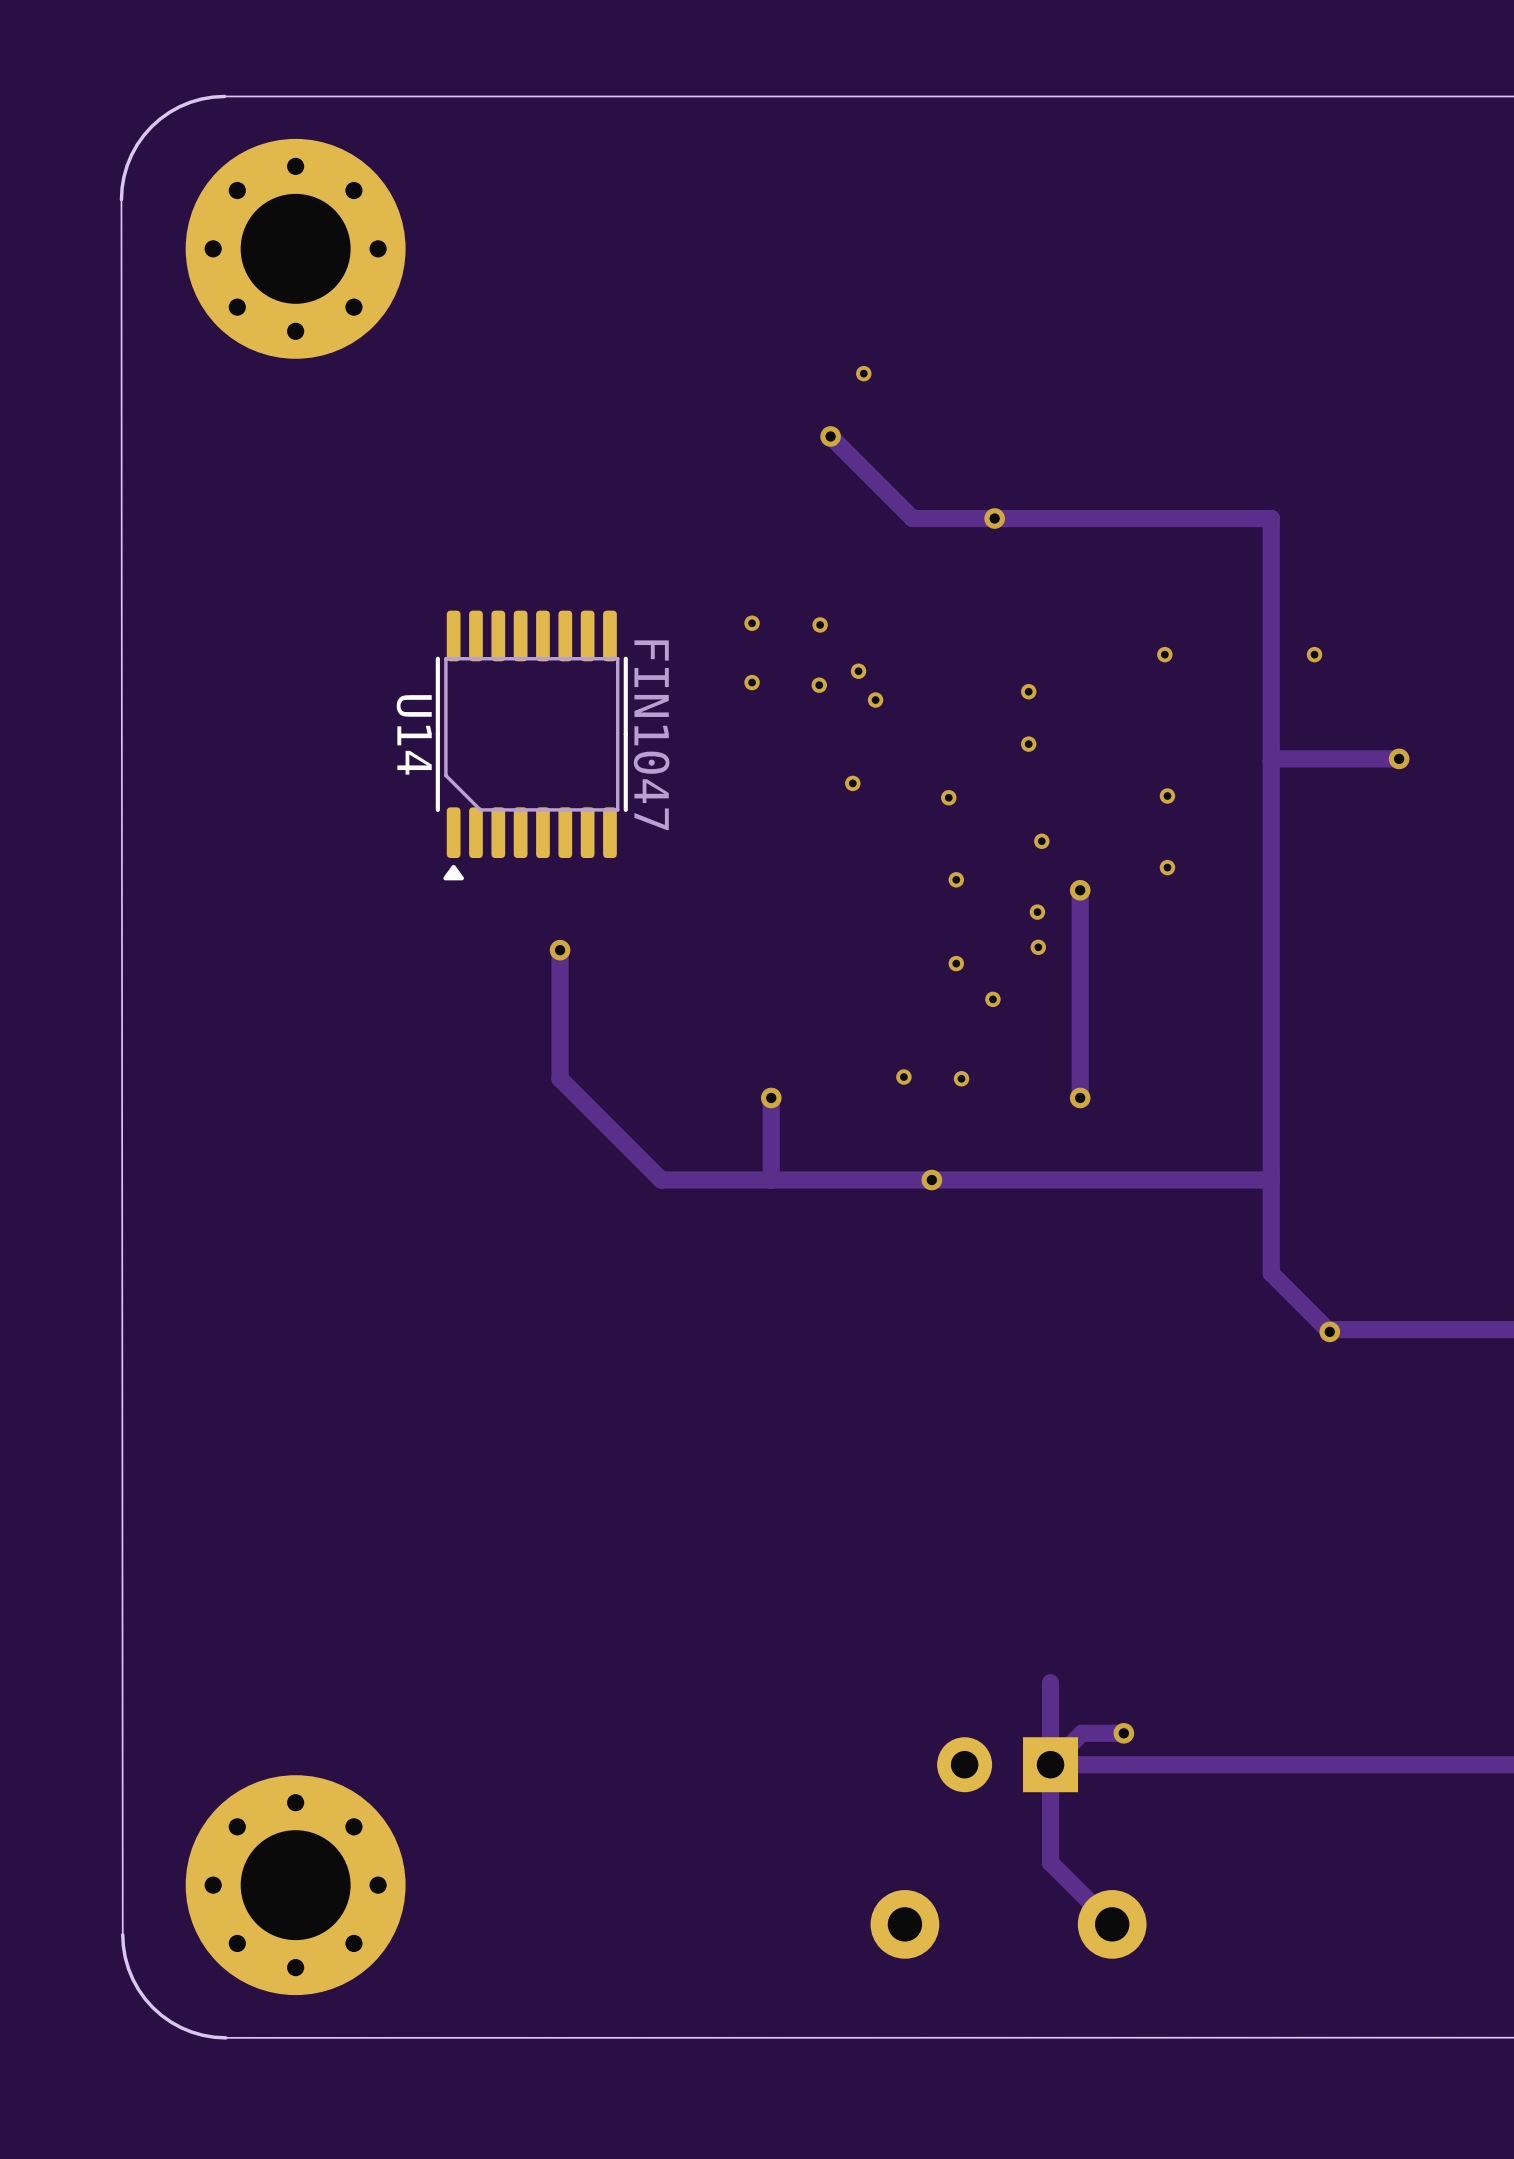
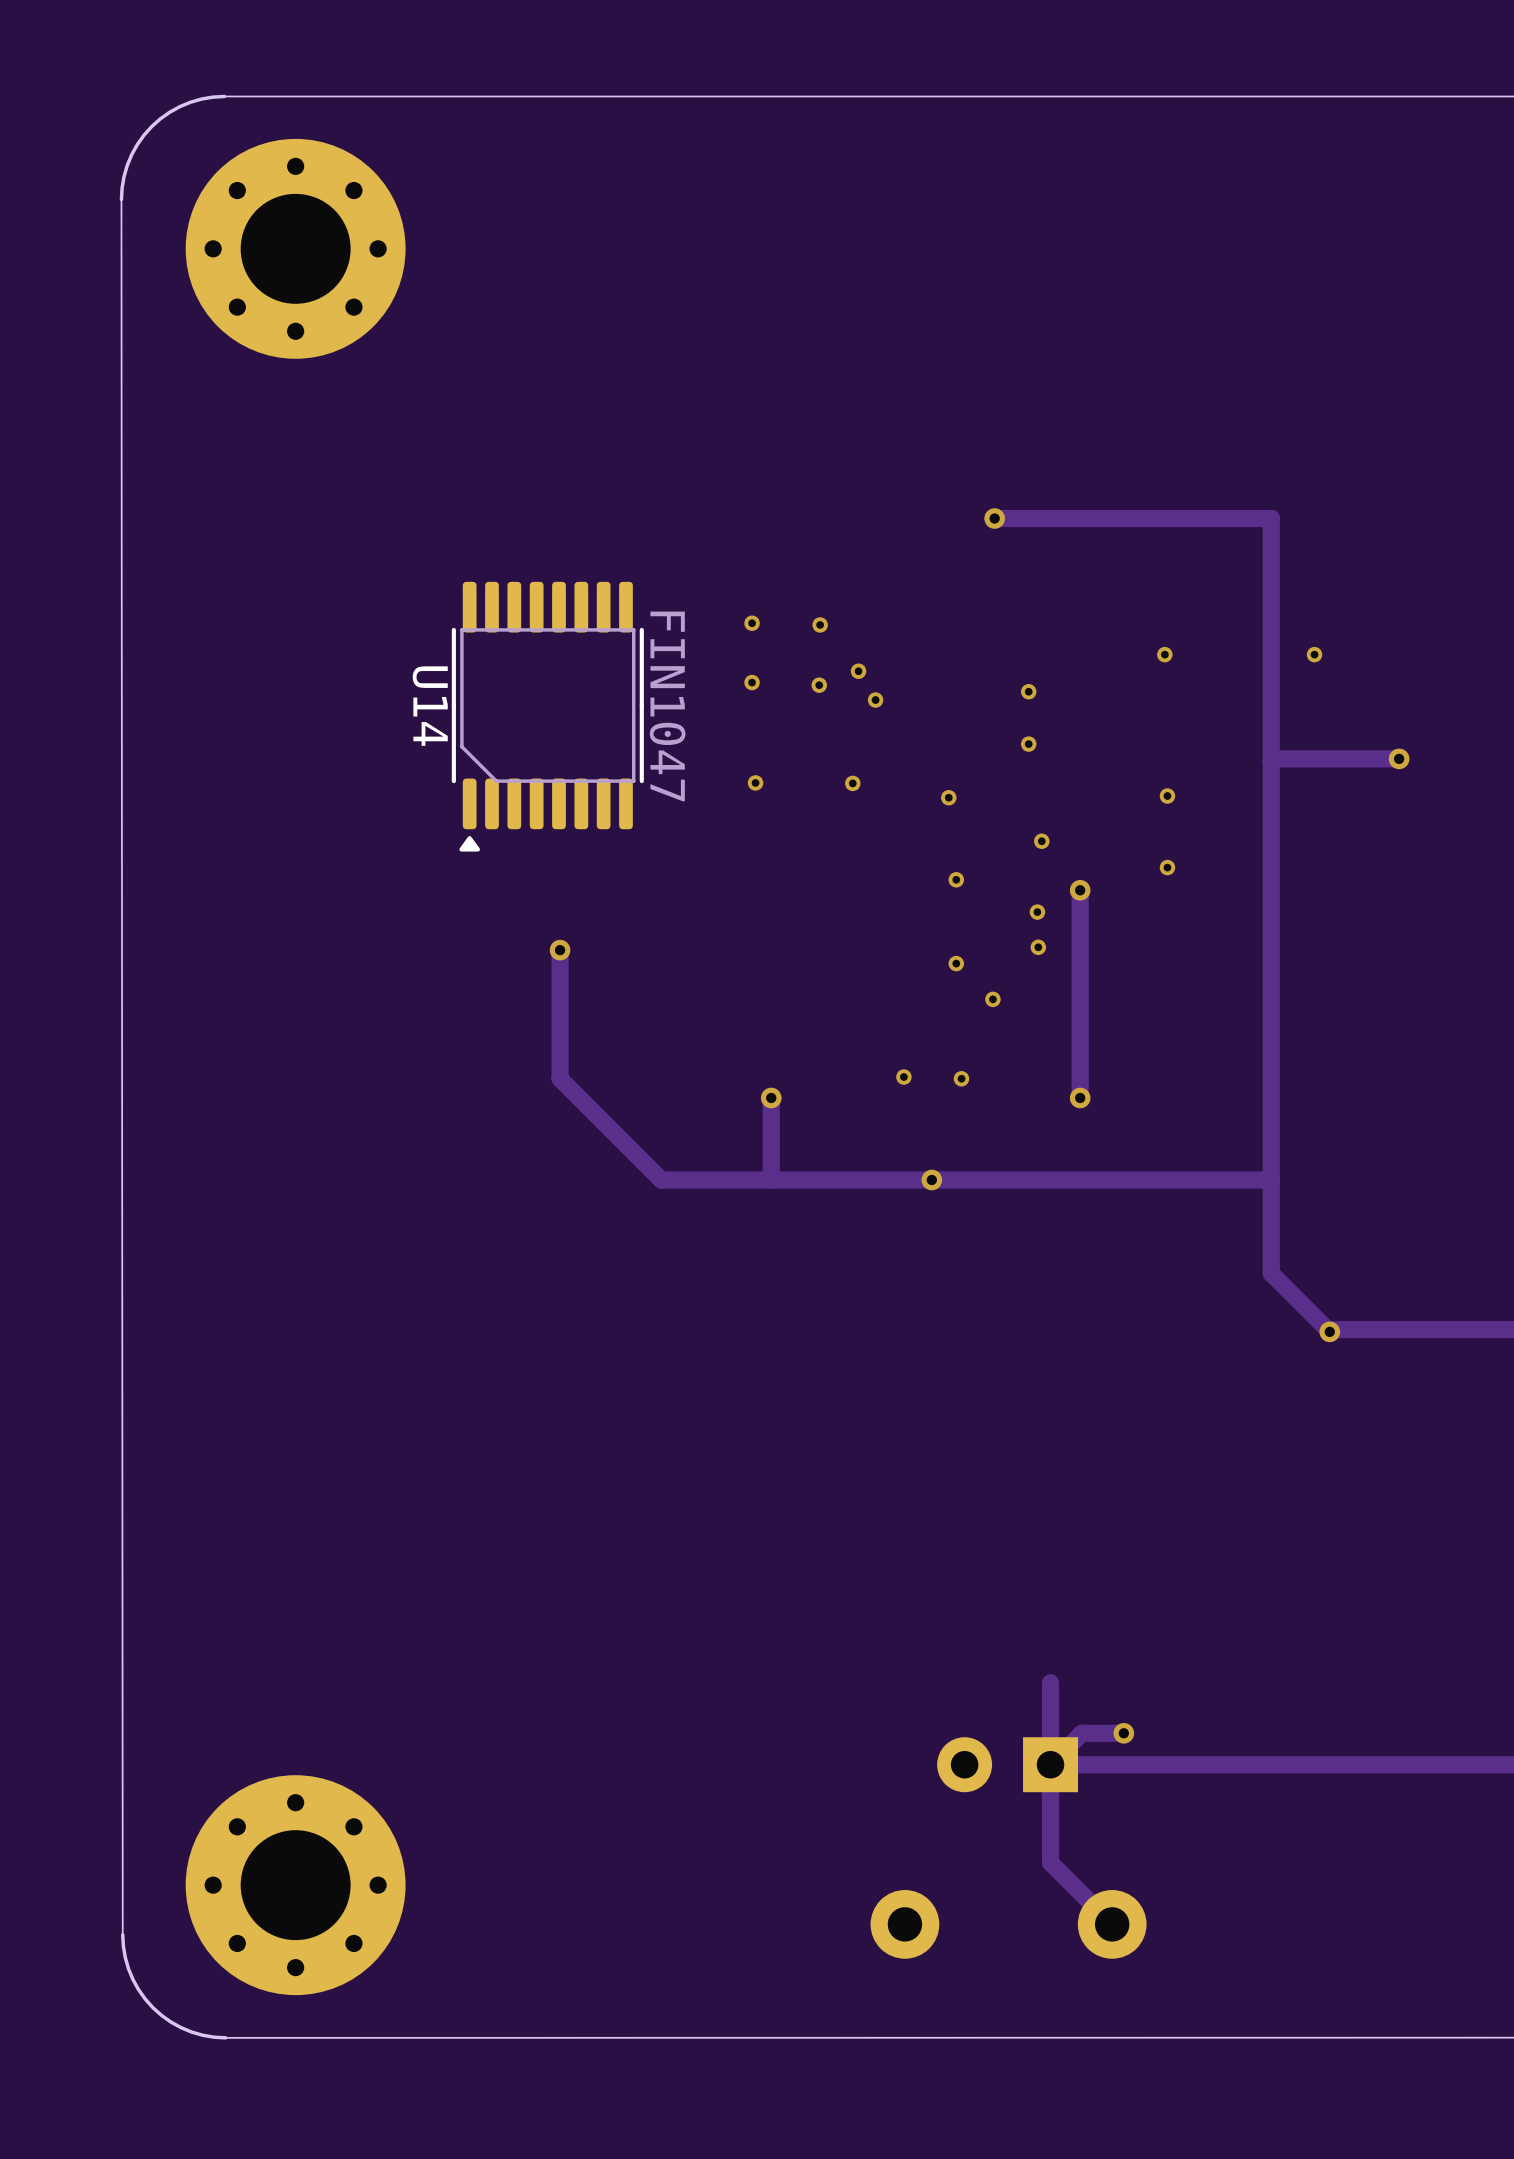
via: (863, 373) -> none
track: (830, 436) (912, 518) (994, 518) -> none
via: (830, 436) -> none
U14 position: (531, 745) -> (547, 716)
via: none -> (755, 782)

